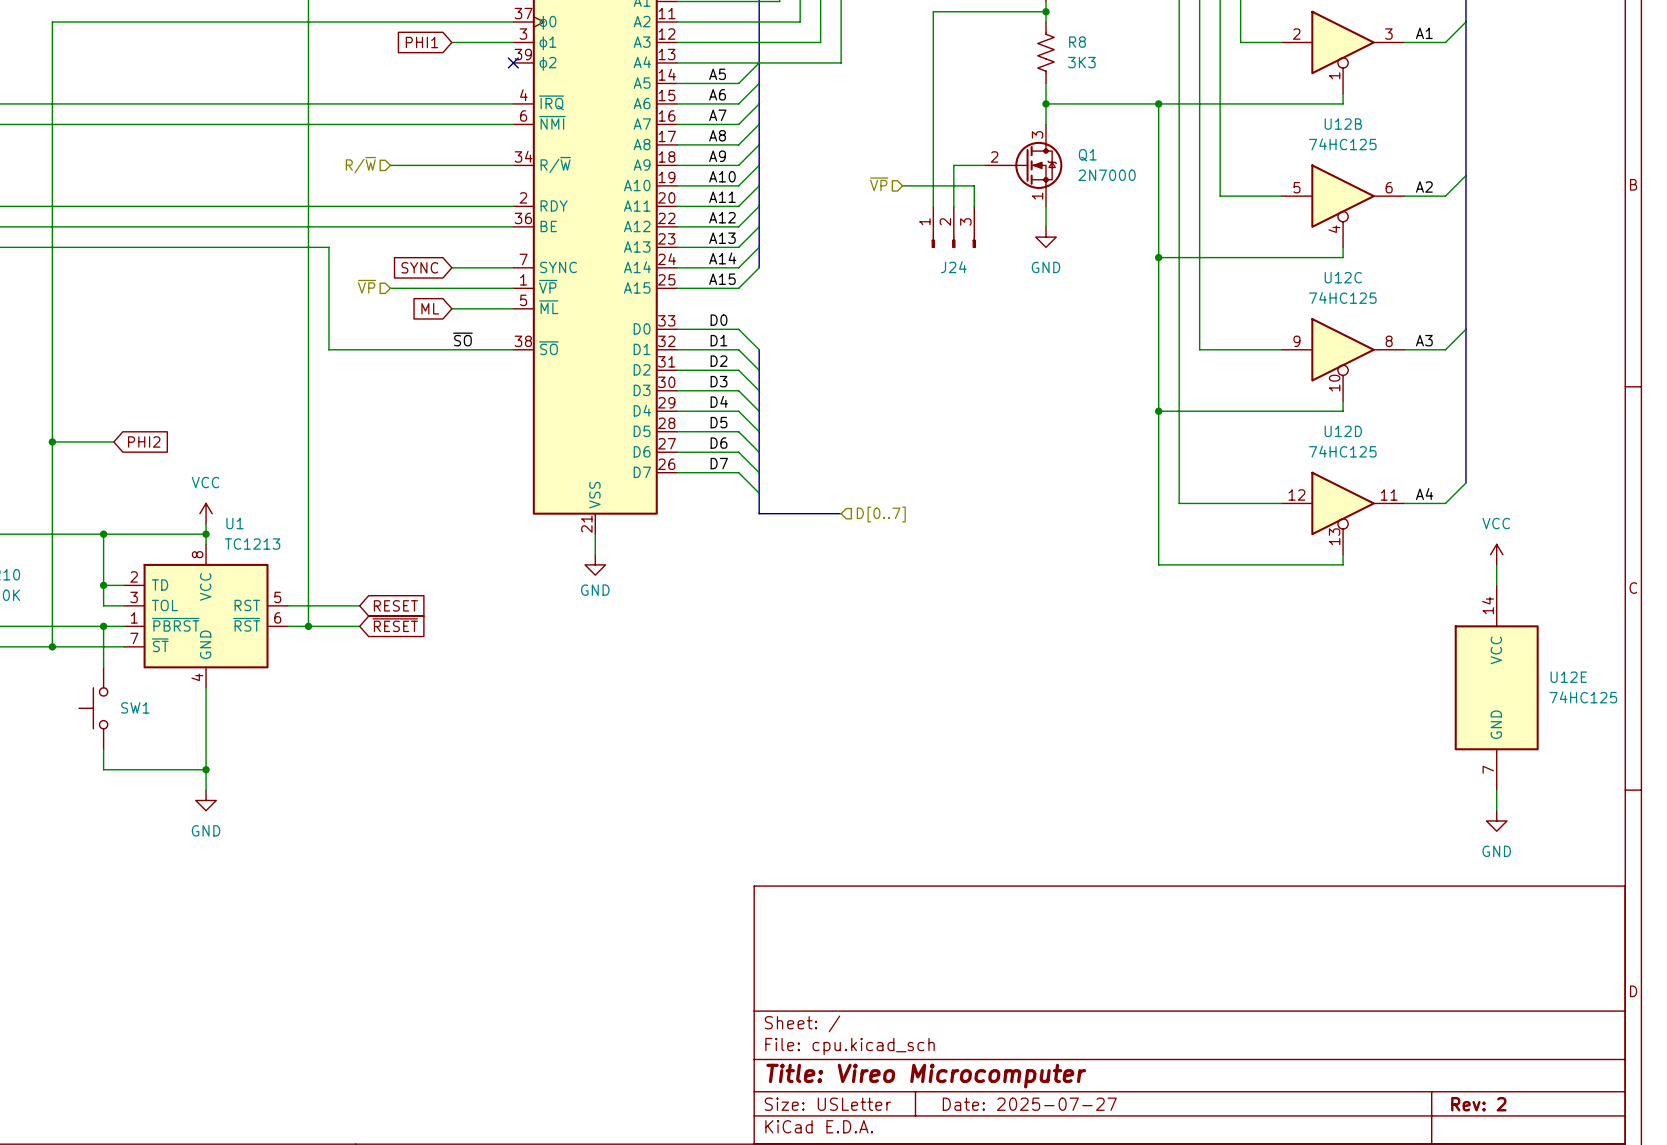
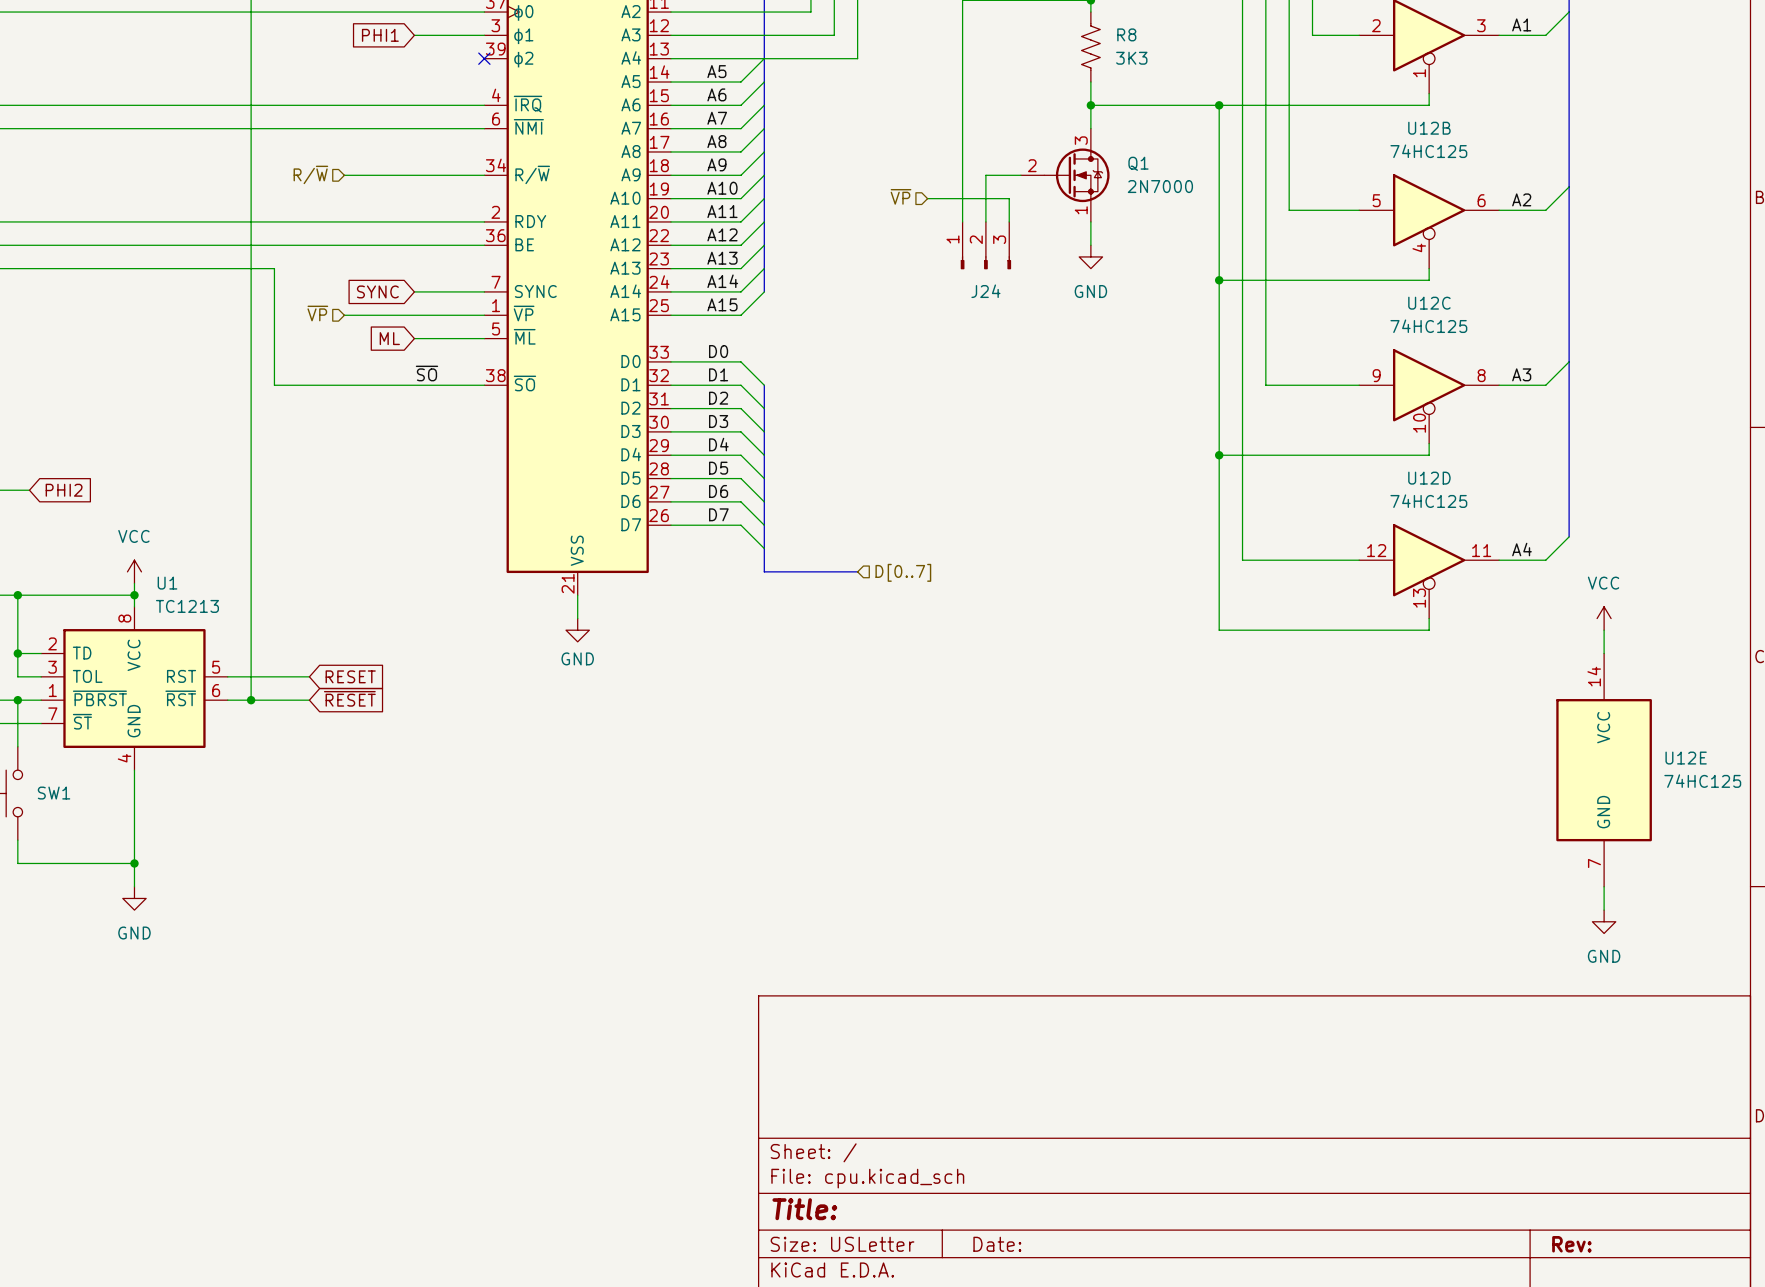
title block: Title: Vireo Microcomputer (926, 1076) -> Title: (804, 1209)
title block: Date: 2025-07-27 (1029, 1104) -> Date: (997, 1244)
title block: Rev: 2 (1478, 1104) -> Rev: (1571, 1244)

